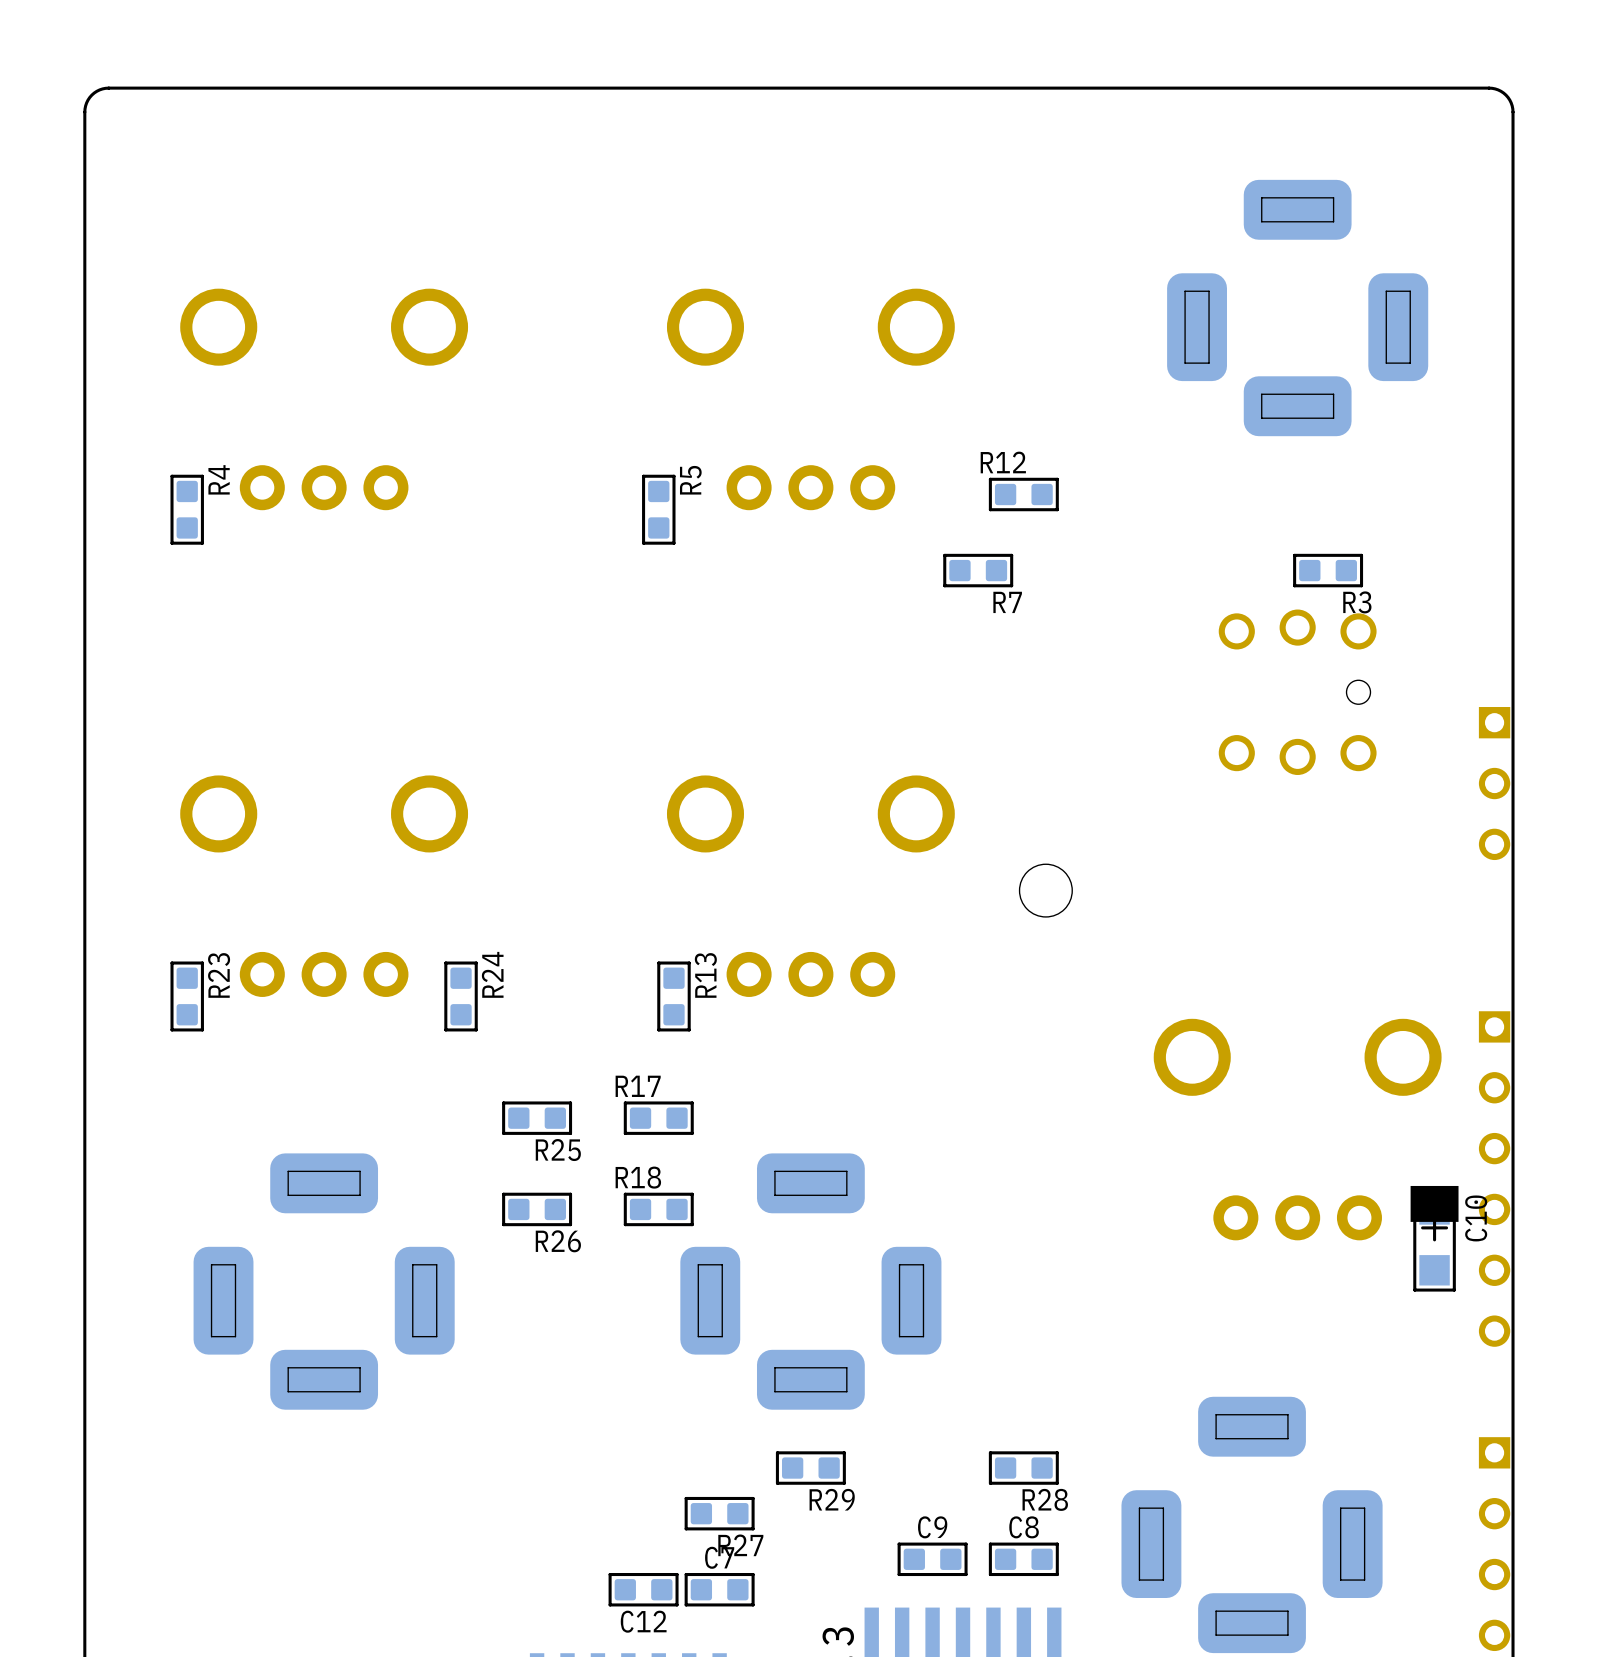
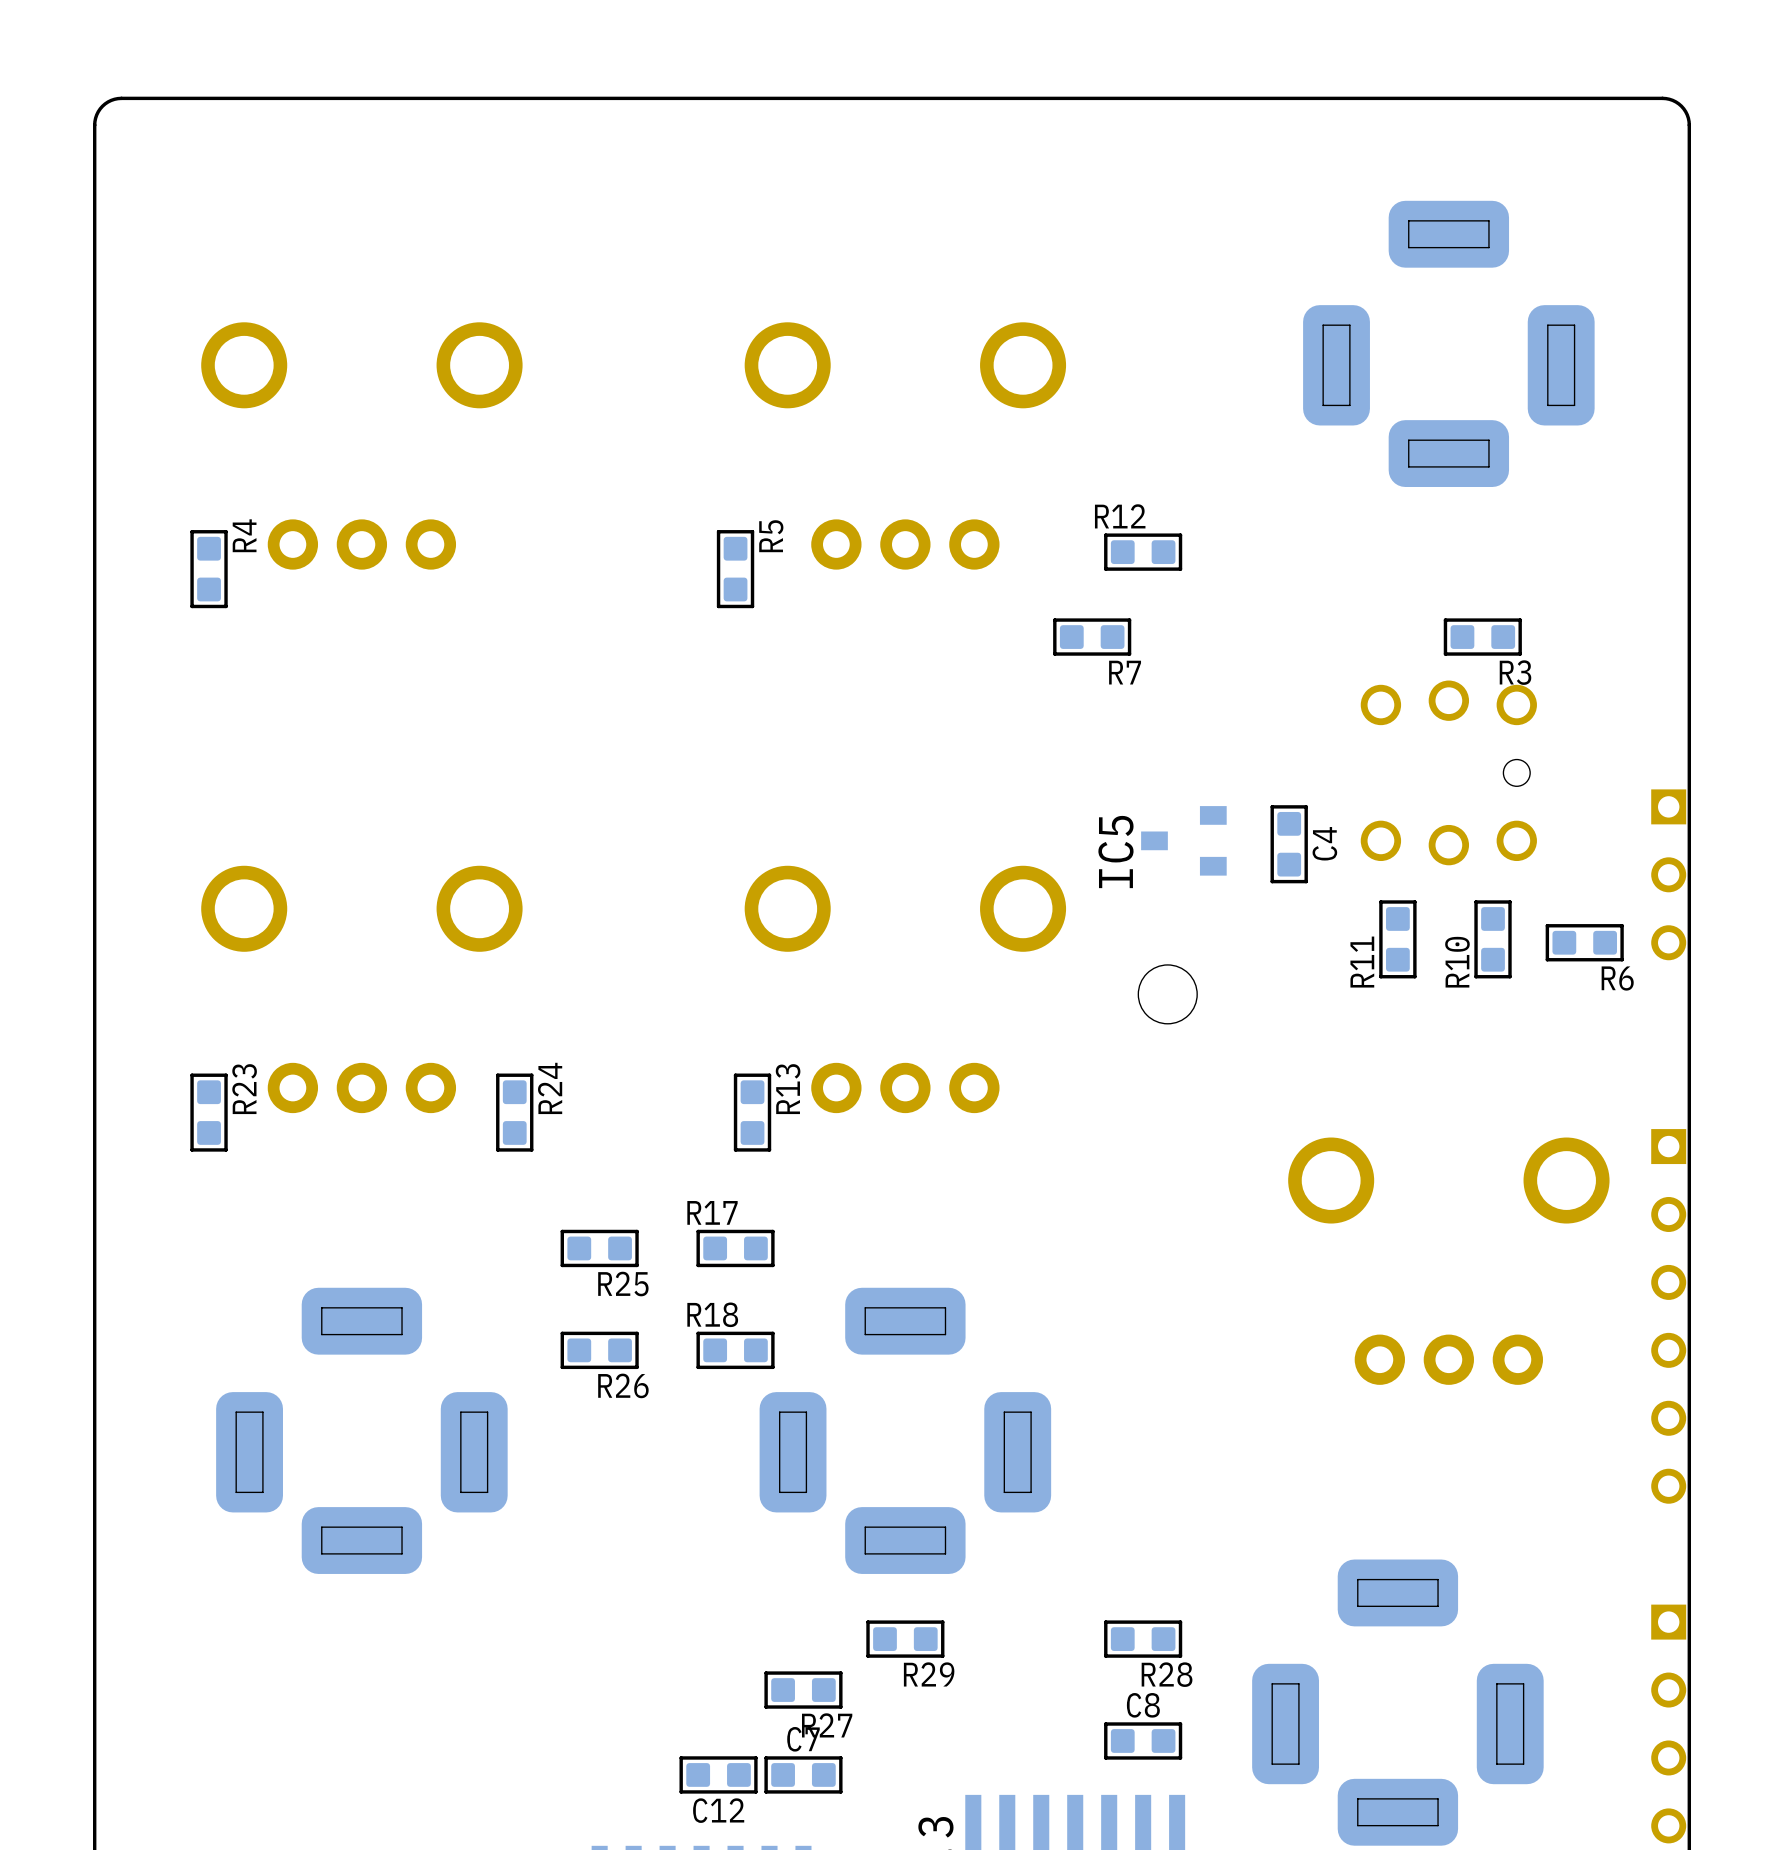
IC5: none -> (1183, 840)
C4: none -> (1289, 844)
R11: none -> (1397, 939)
R10: none -> (1493, 939)
R6: none -> (1584, 942)
C10: (1434, 1238) -> none
C9: (932, 1559) -> none

